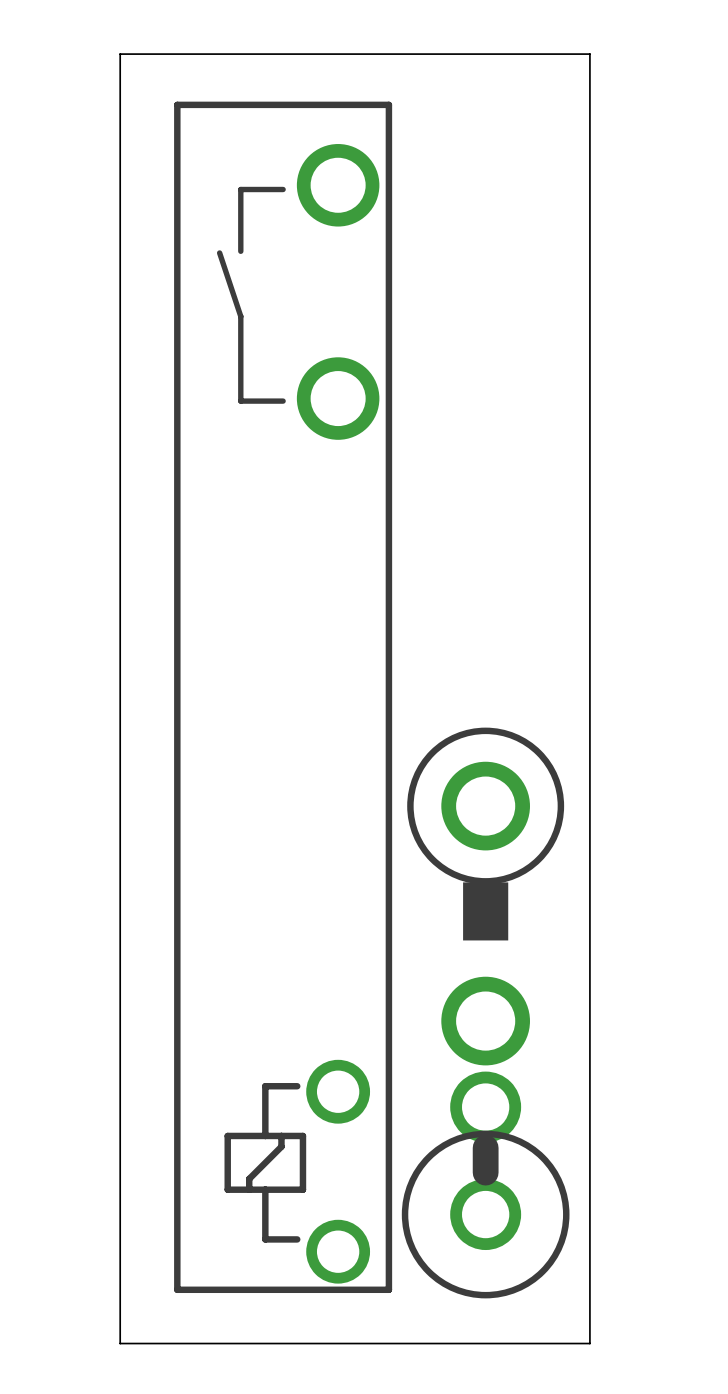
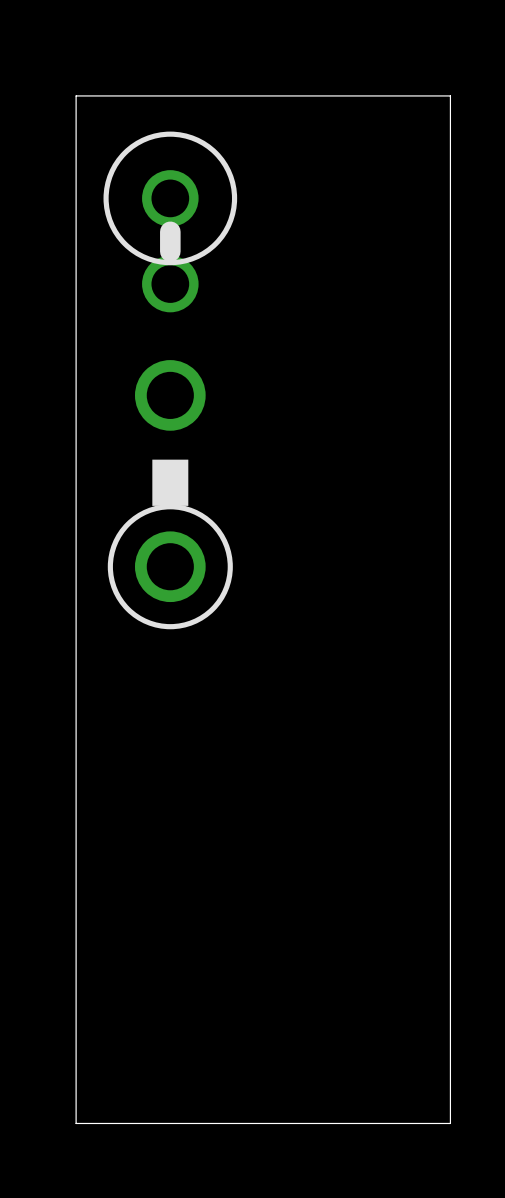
part: (283, 697) -> none
part rotation: 0° (485, 896) -> 180° (170, 494)
part position: (485, 896) -> (170, 494)
part rotation: 0° (485, 1184) -> 180° (170, 221)
part position: (485, 1184) -> (170, 221)

